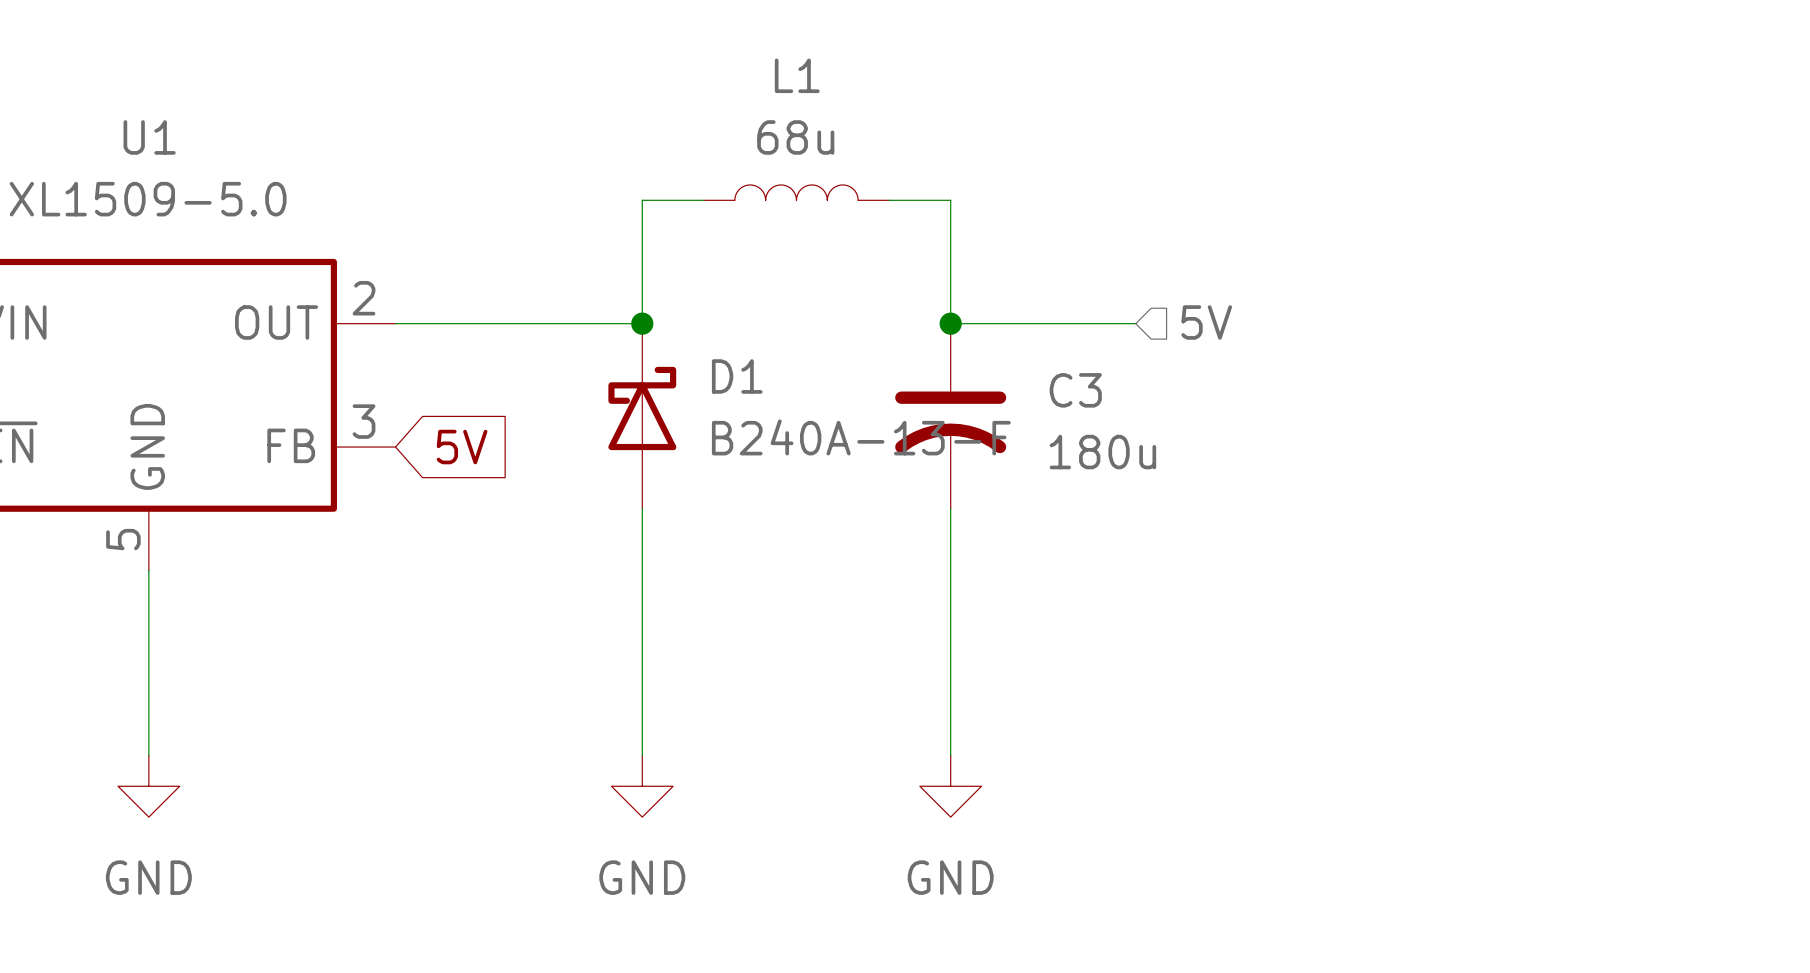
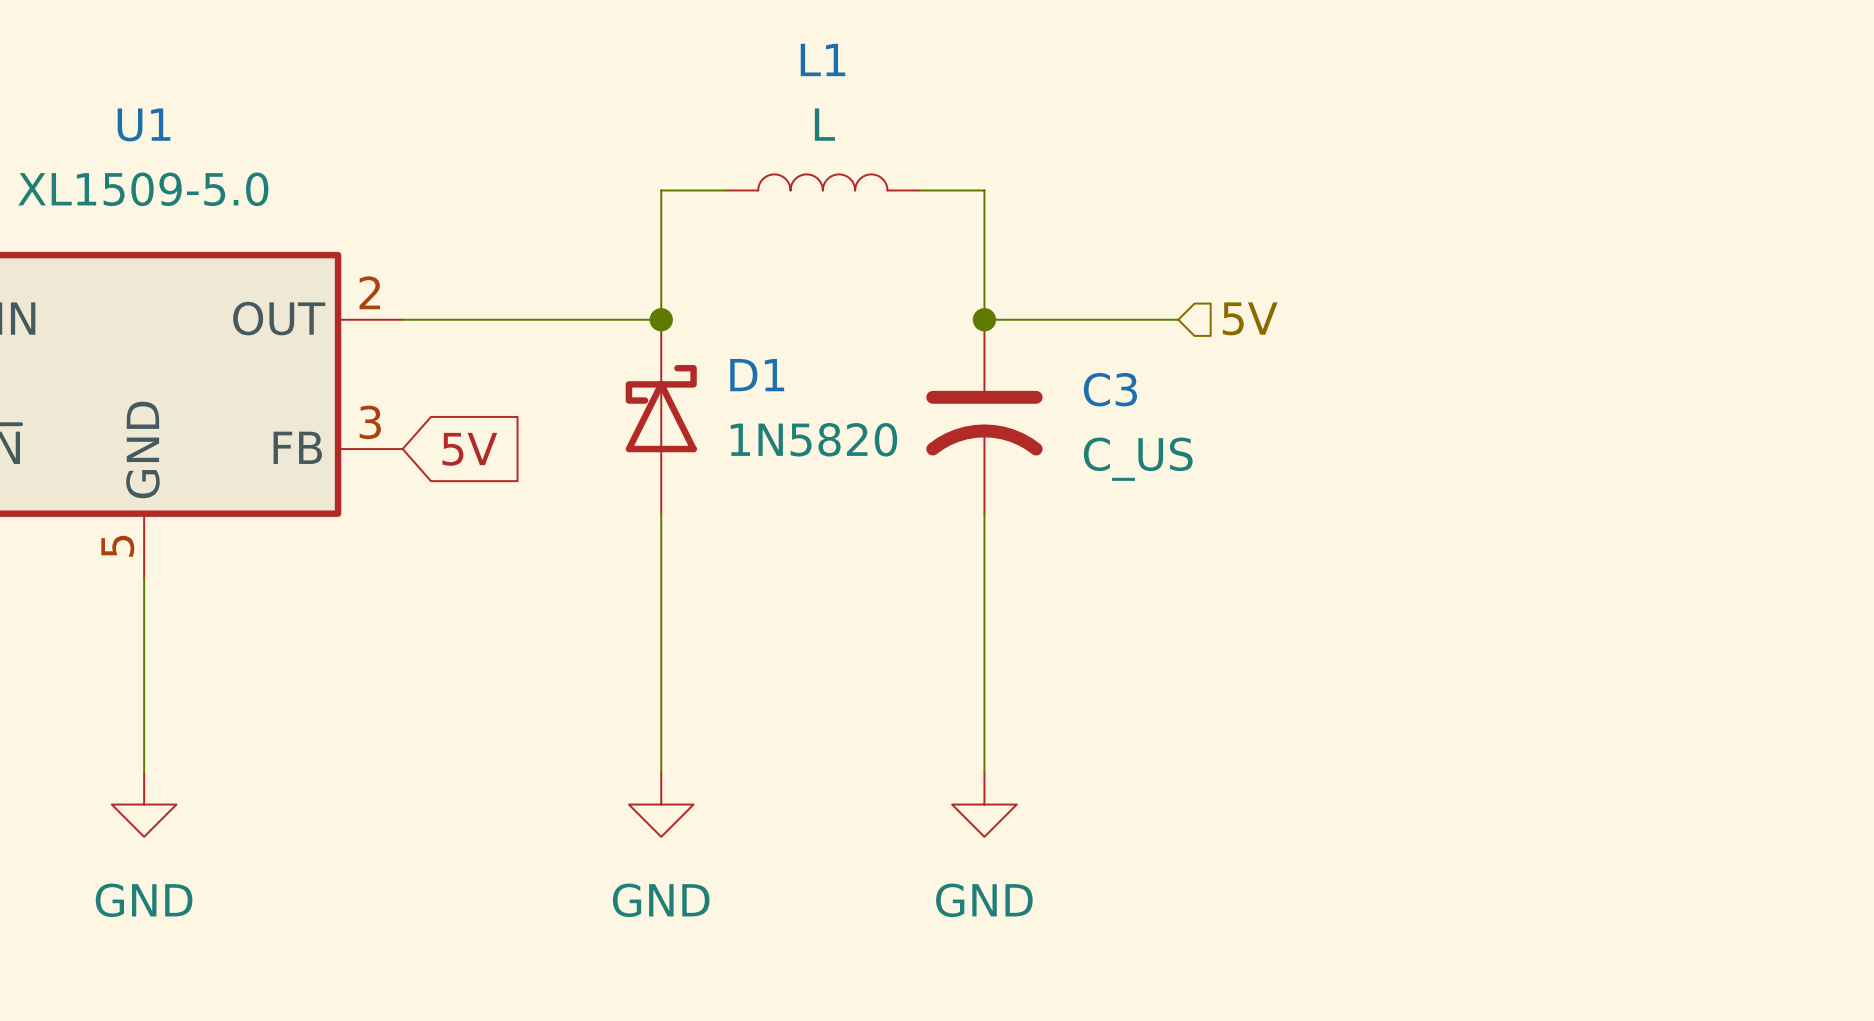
L1 value: 68u (795, 137) -> L (824, 124)
D1 value: B240A-13-F (861, 437) -> 1N5820 (813, 439)
C3 value: 180u (1102, 452) -> C_US (1138, 459)

